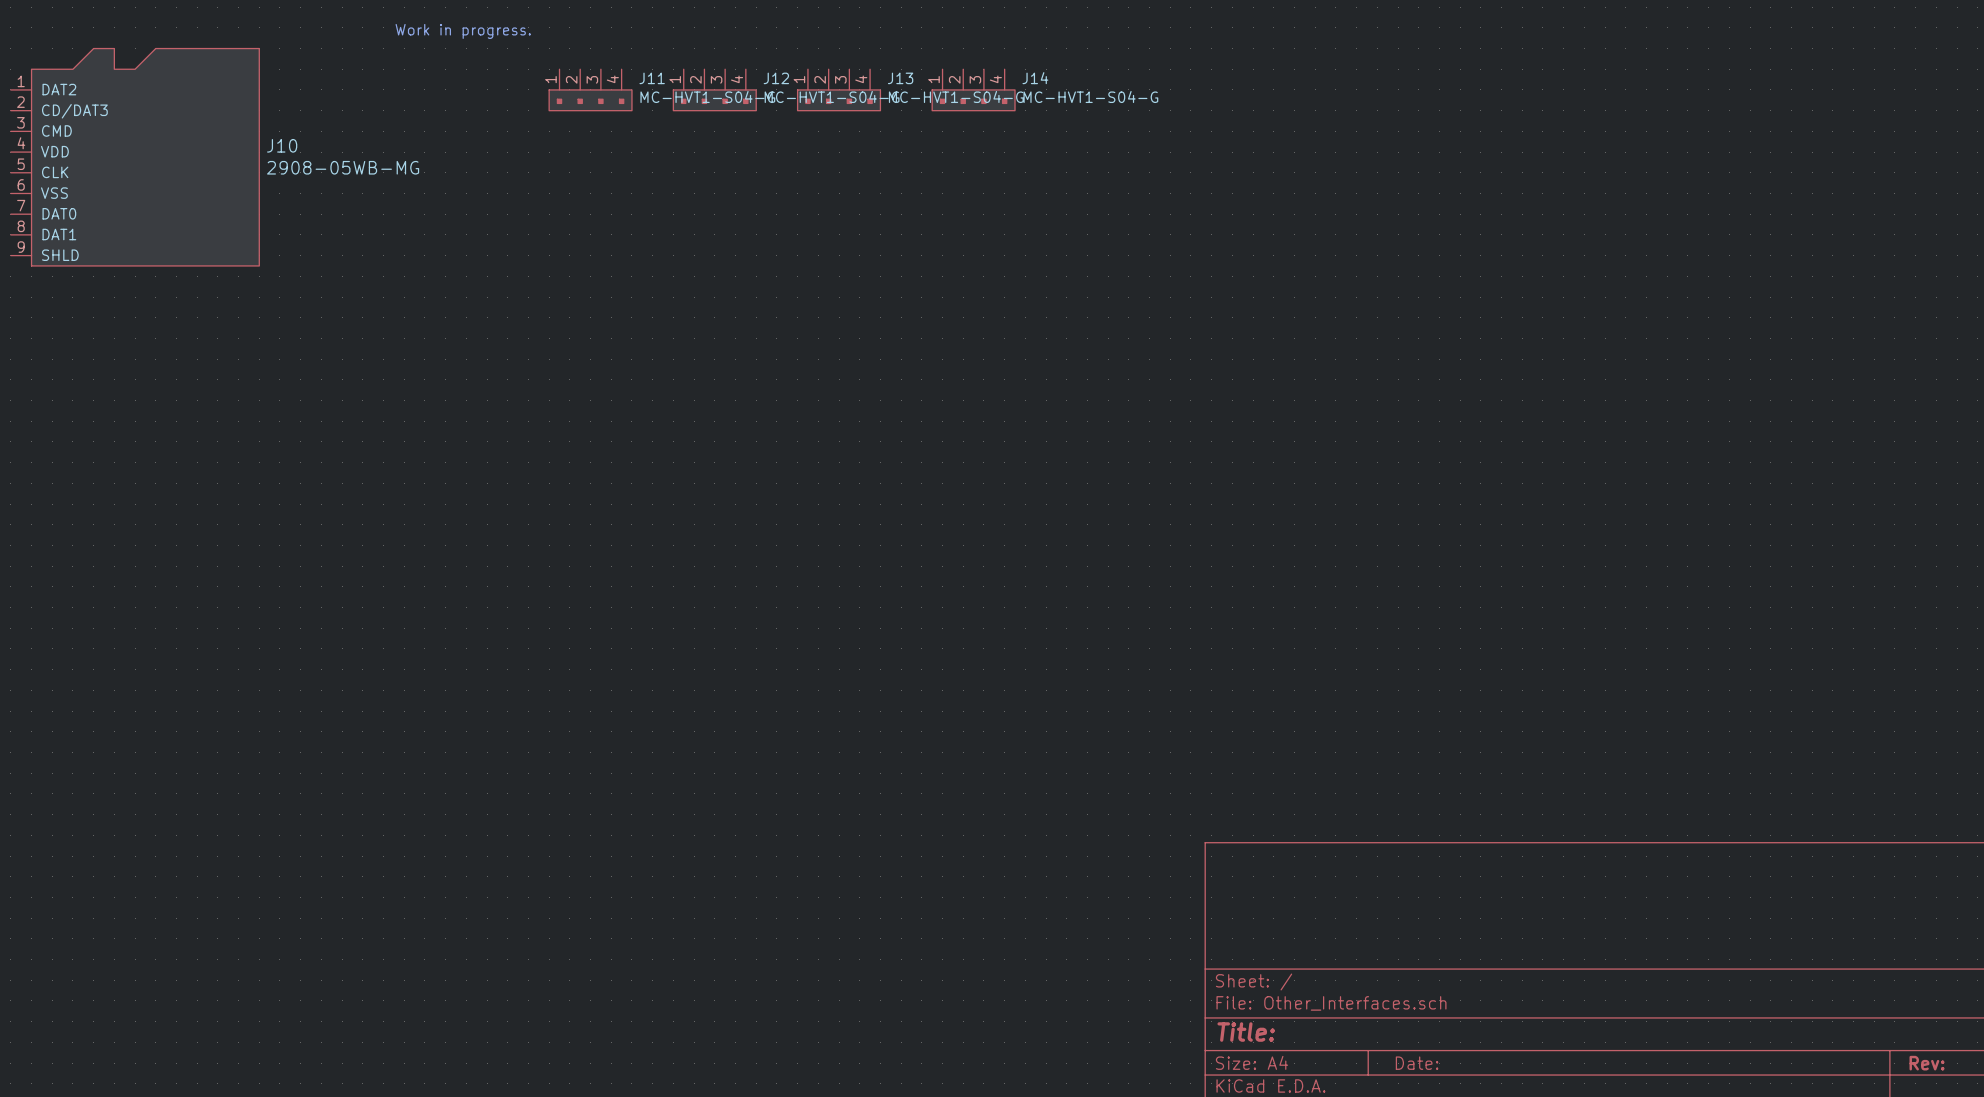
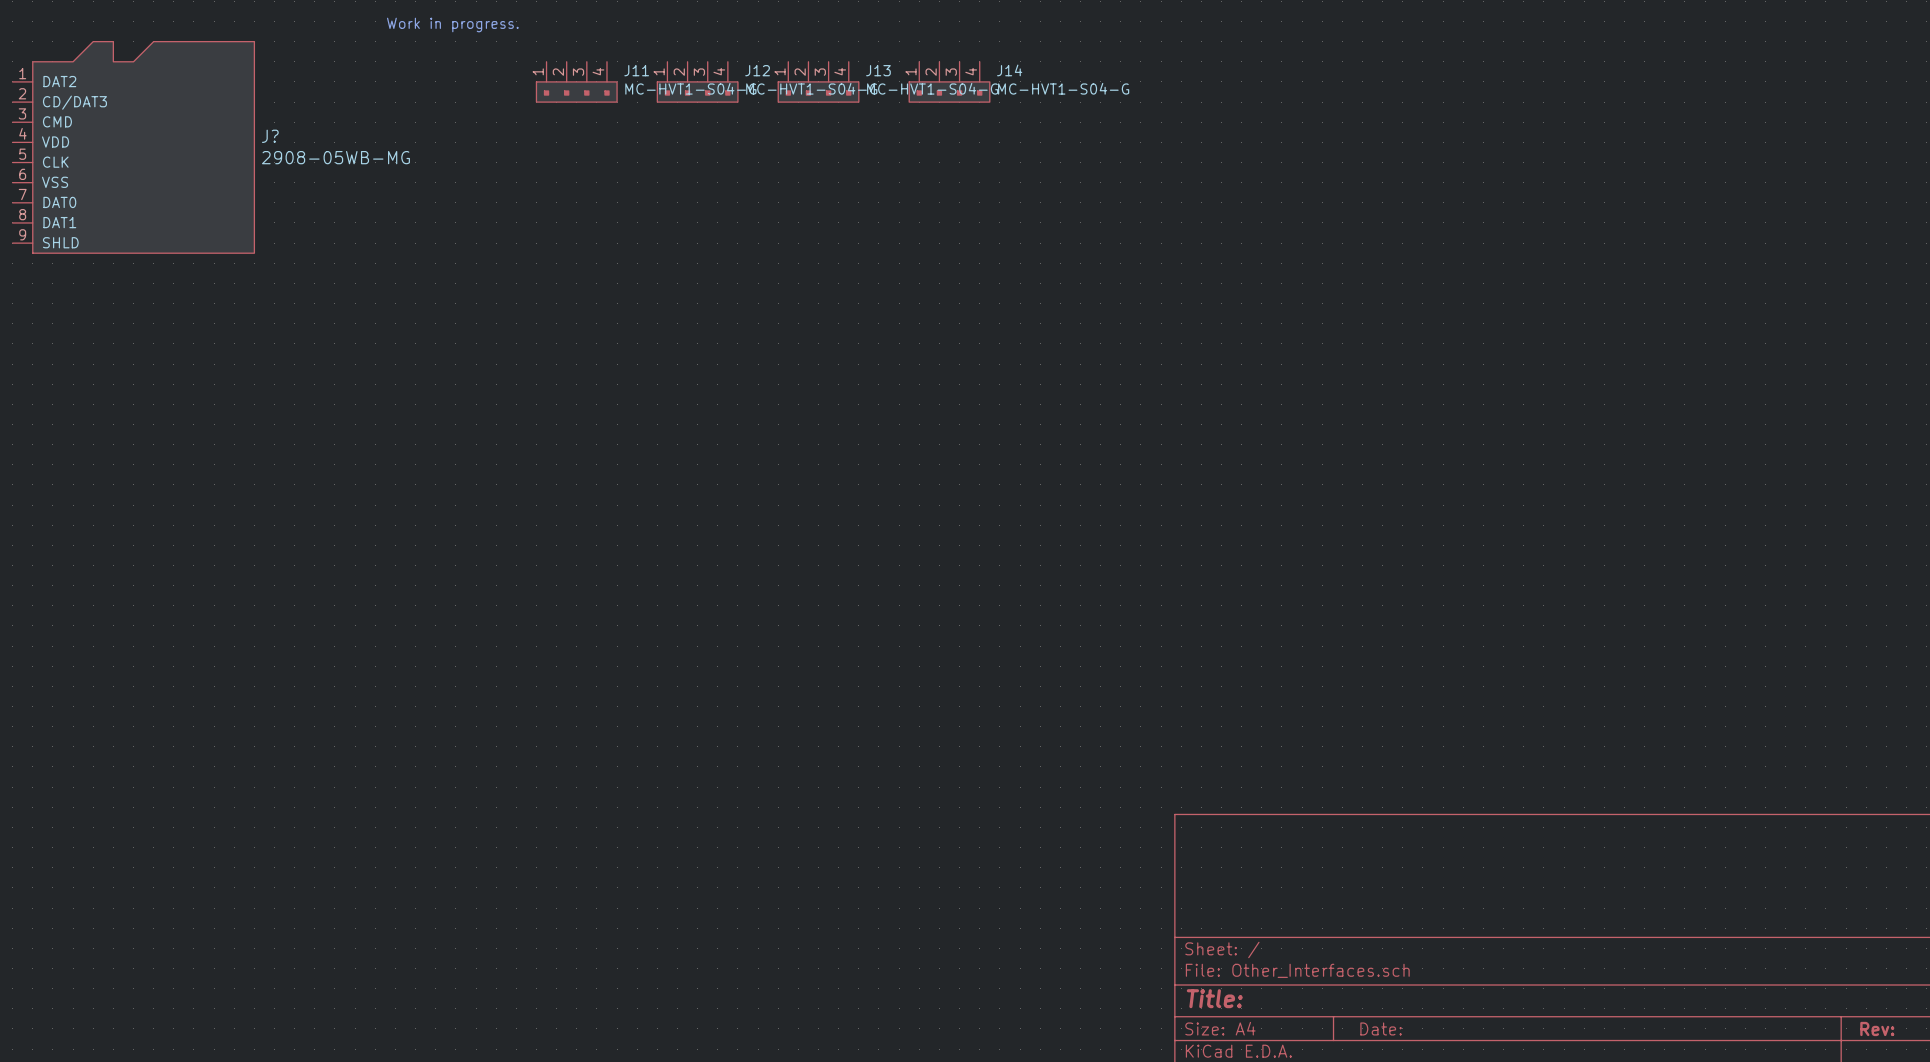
J10 name: J10 (282, 145) -> J? (270, 136)

